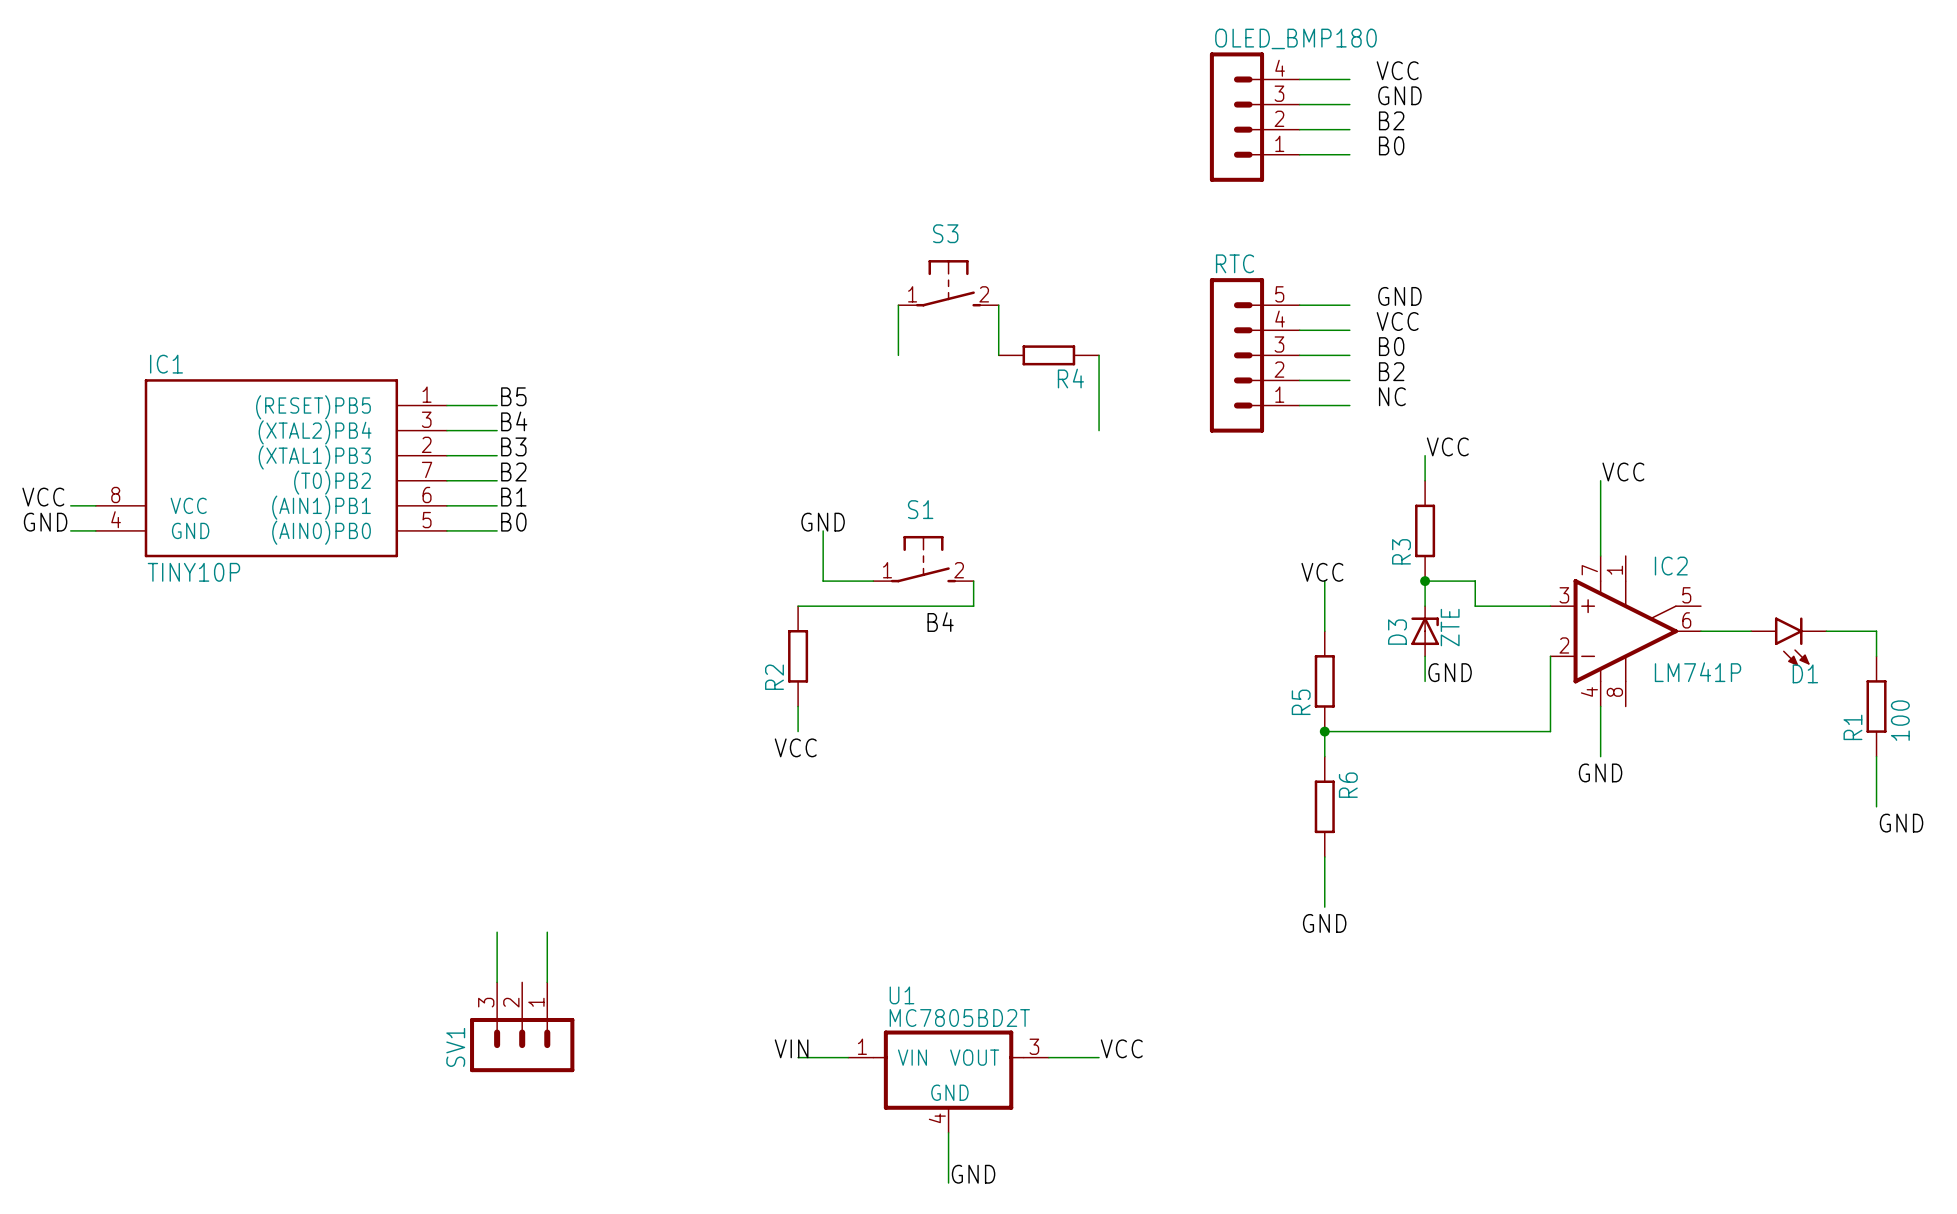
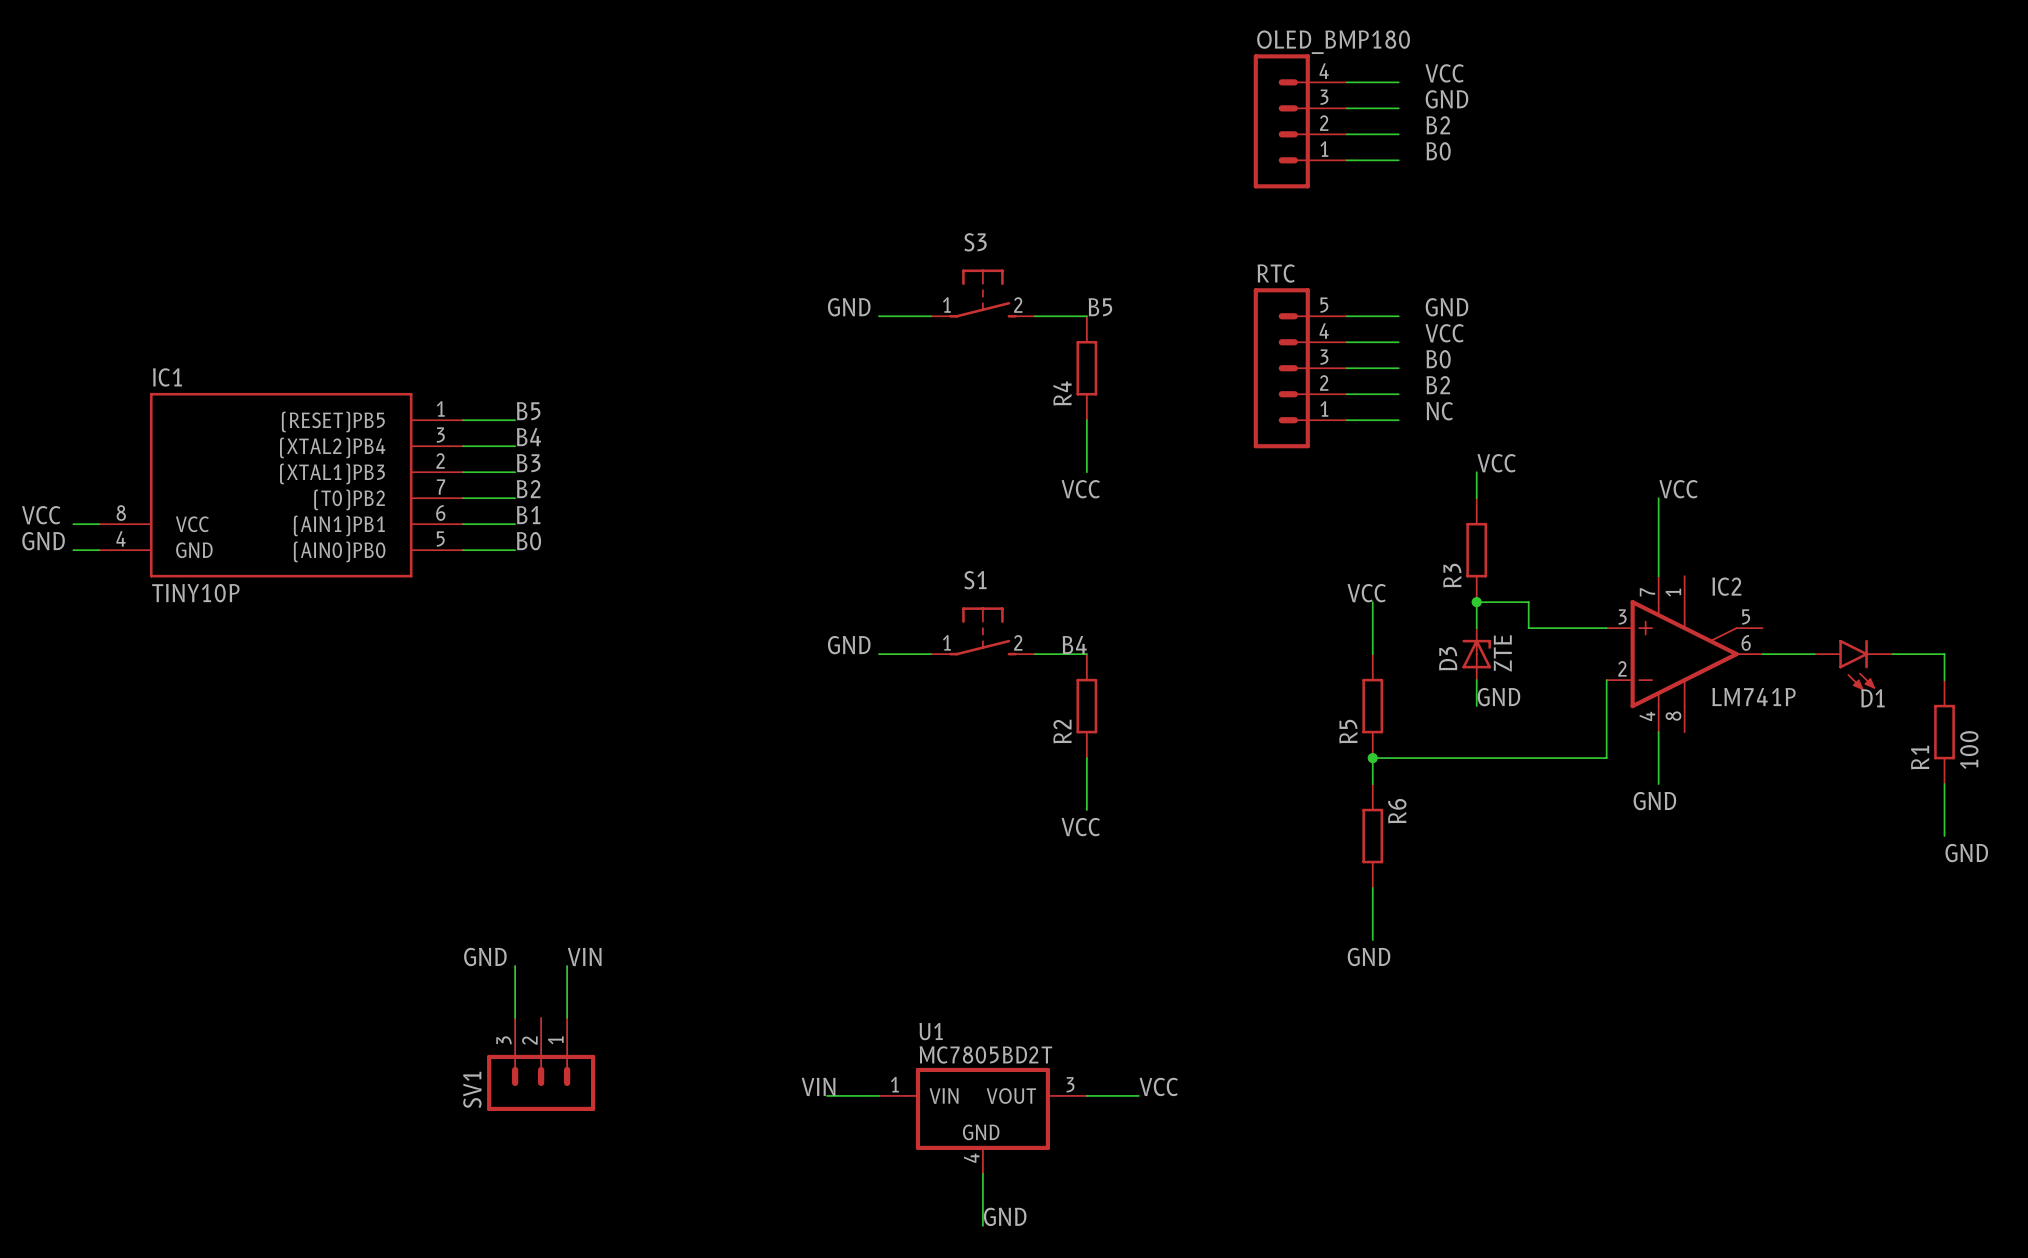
label: none -> GND (849, 307)
label: none -> B5 (1100, 307)
wire: (898, 305) (898, 355) -> (930, 316) (878, 316)
wire: (998, 305) (998, 355) -> (1034, 316) (1086, 316)
R4 rotation: 0° (1048, 355) -> 90° clockwise (1086, 368)
wire: (1099, 355) (1099, 430) -> none
wire: none -> (1086, 420) (1086, 472)
label: none -> VCC (1080, 489)
label position: GND (823, 522) -> GND (849, 645)
wire: (823, 530) (823, 581) (873, 581) -> none
S1 position: (923, 559) -> (982, 631)
wire: (973, 581) (973, 606) (798, 606) -> none
label position: B4 (940, 622) -> B4 (1074, 645)
wire: none -> (878, 654) (930, 654)
wire: none -> (1034, 654) (1086, 654)
R2 position: (798, 656) -> (1086, 706)
wire: (798, 706) (798, 731) -> none
wire: none -> (1086, 758) (1086, 810)
label: VCC (795, 747) -> none
label: none -> VCC (1080, 827)
label: none -> GND (485, 956)
label: none -> VIN (584, 957)

